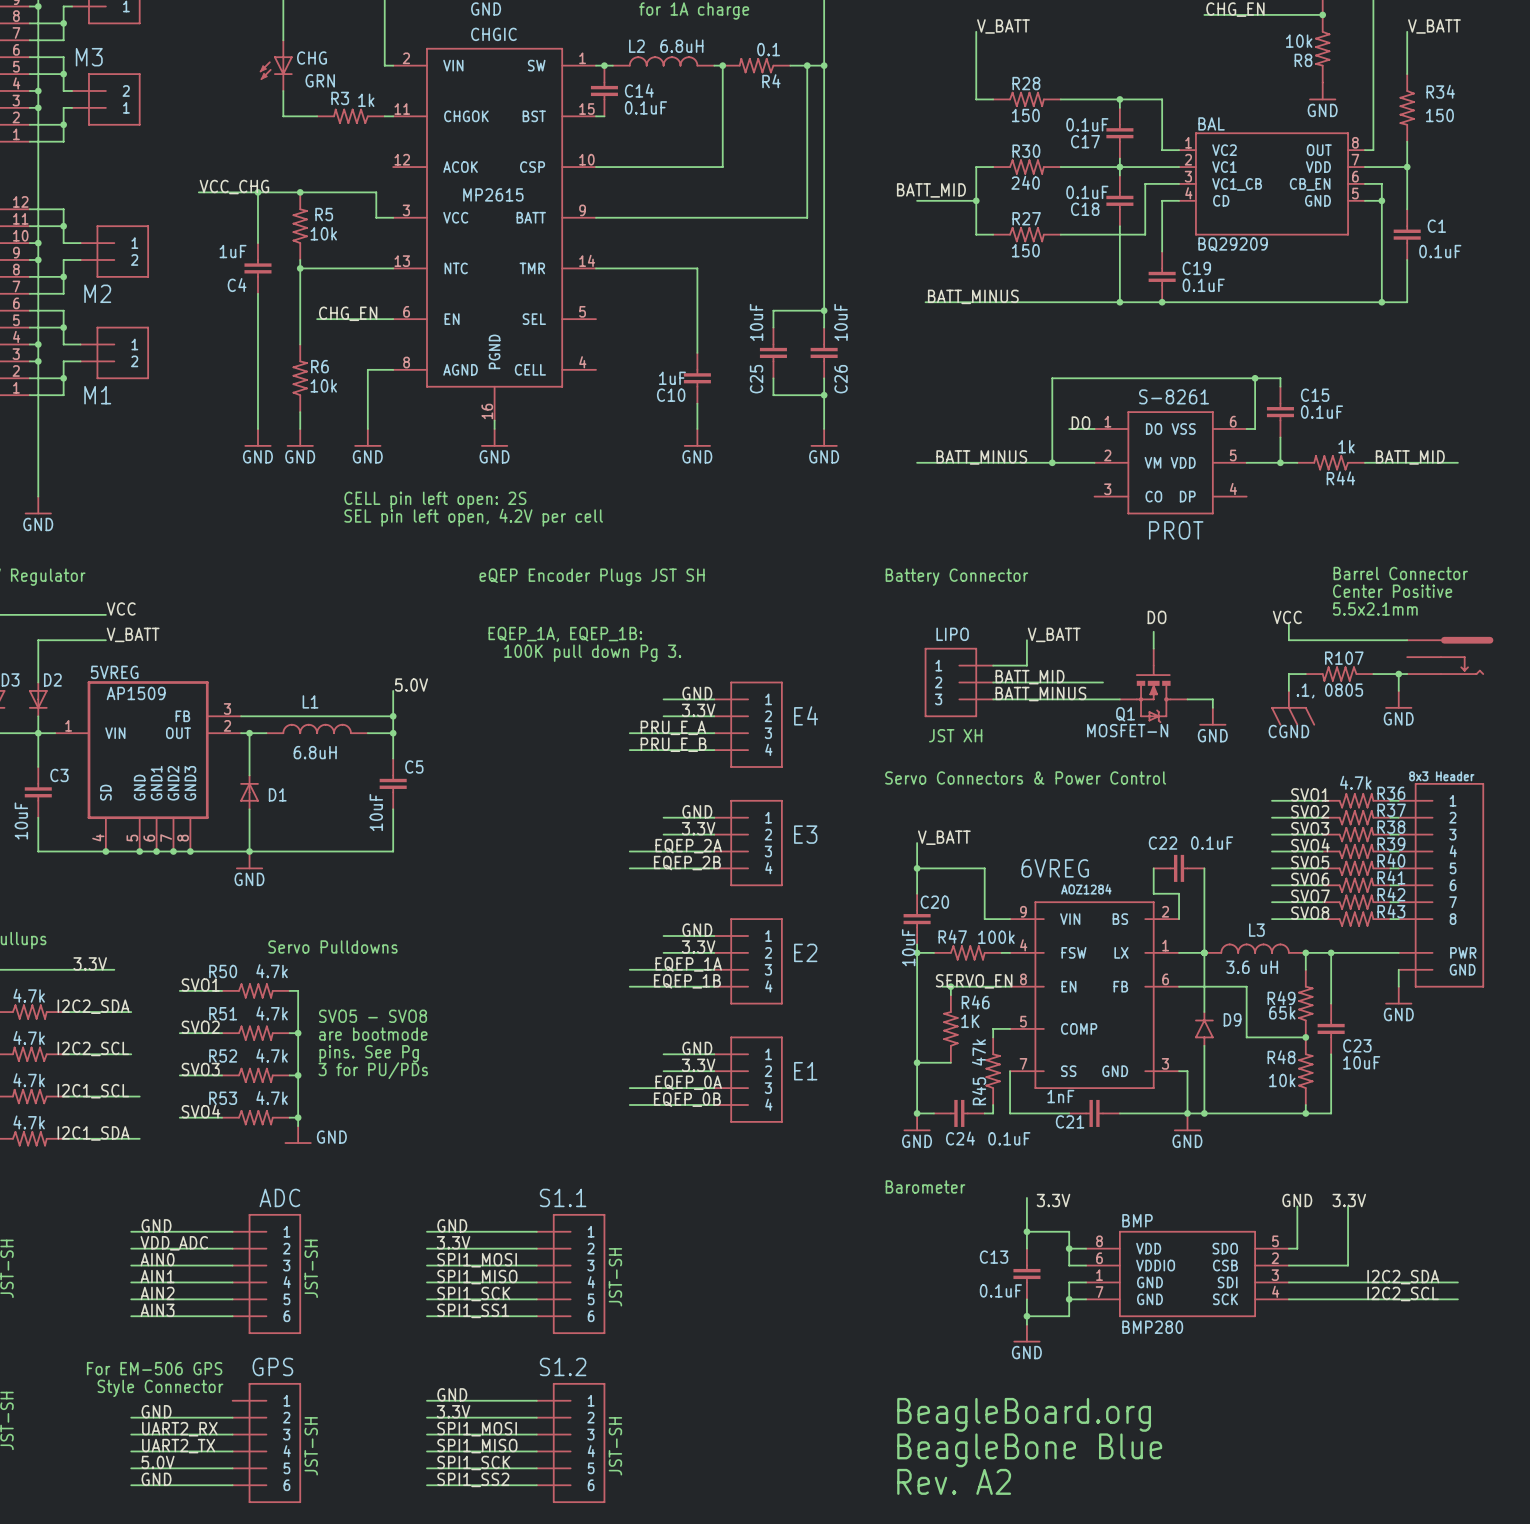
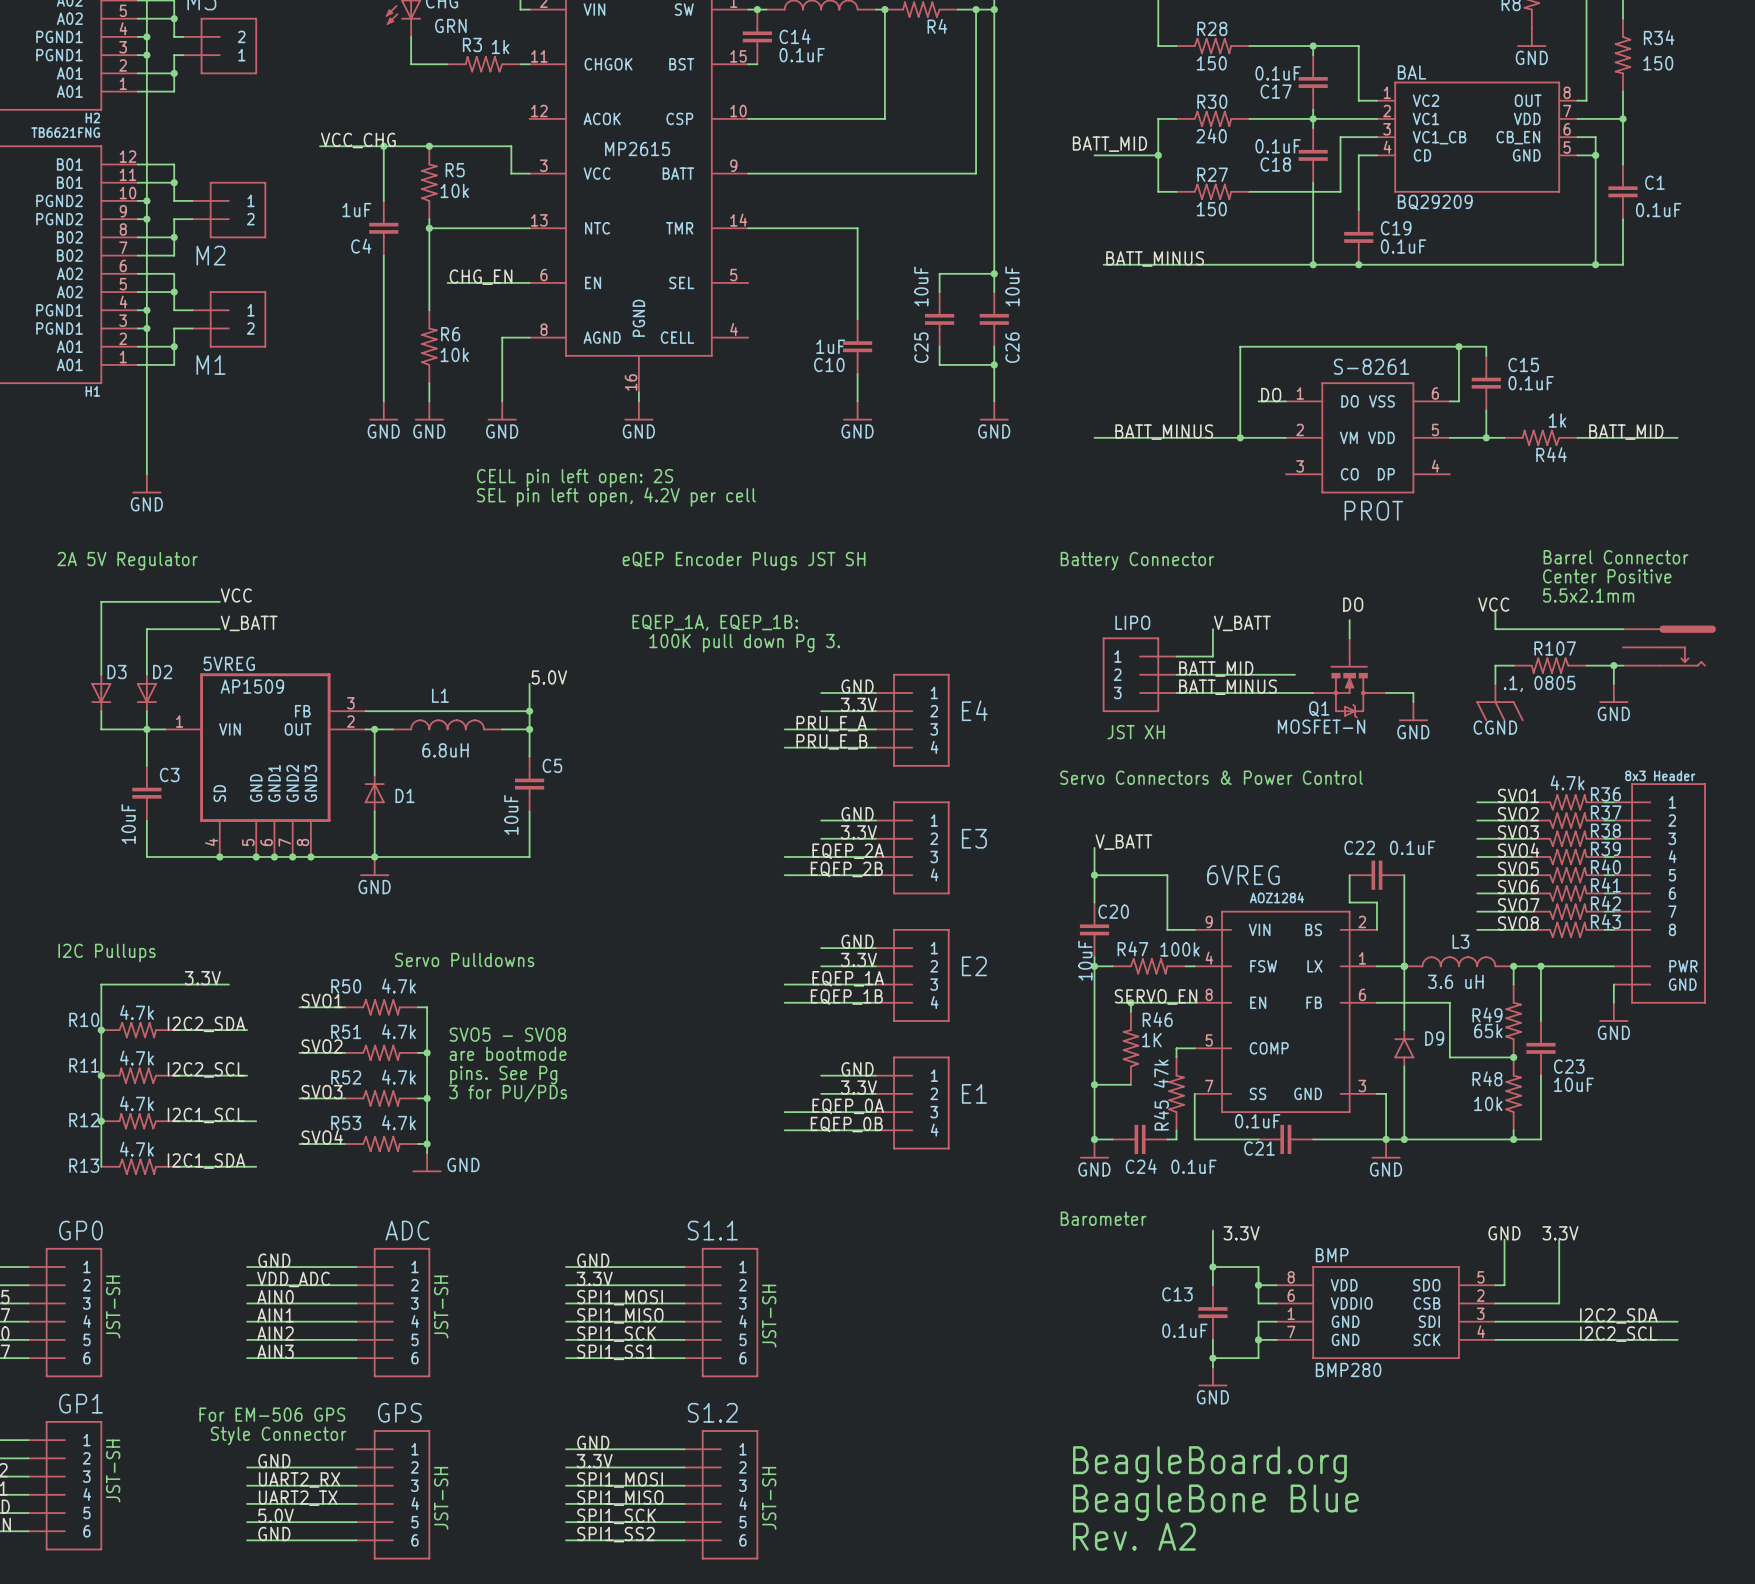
C21 value: 1nF (1060, 1096) -> 0.1uF (1257, 1121)

